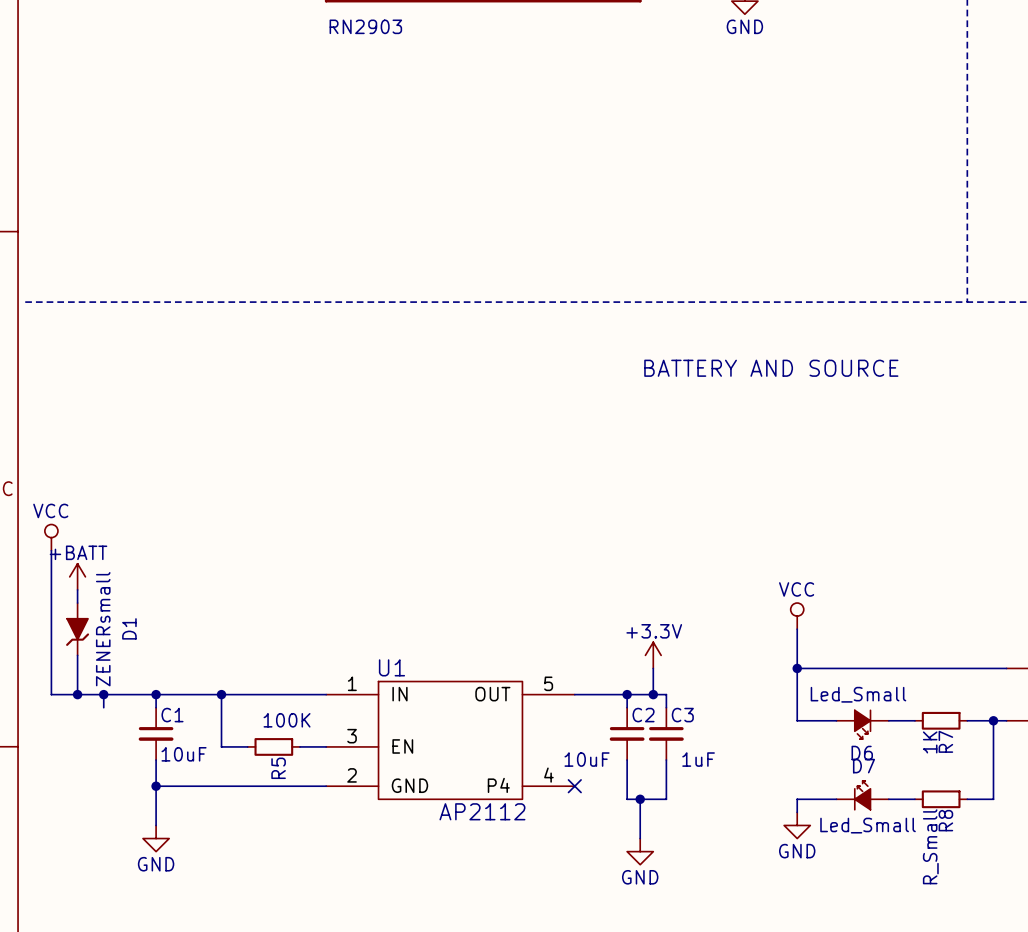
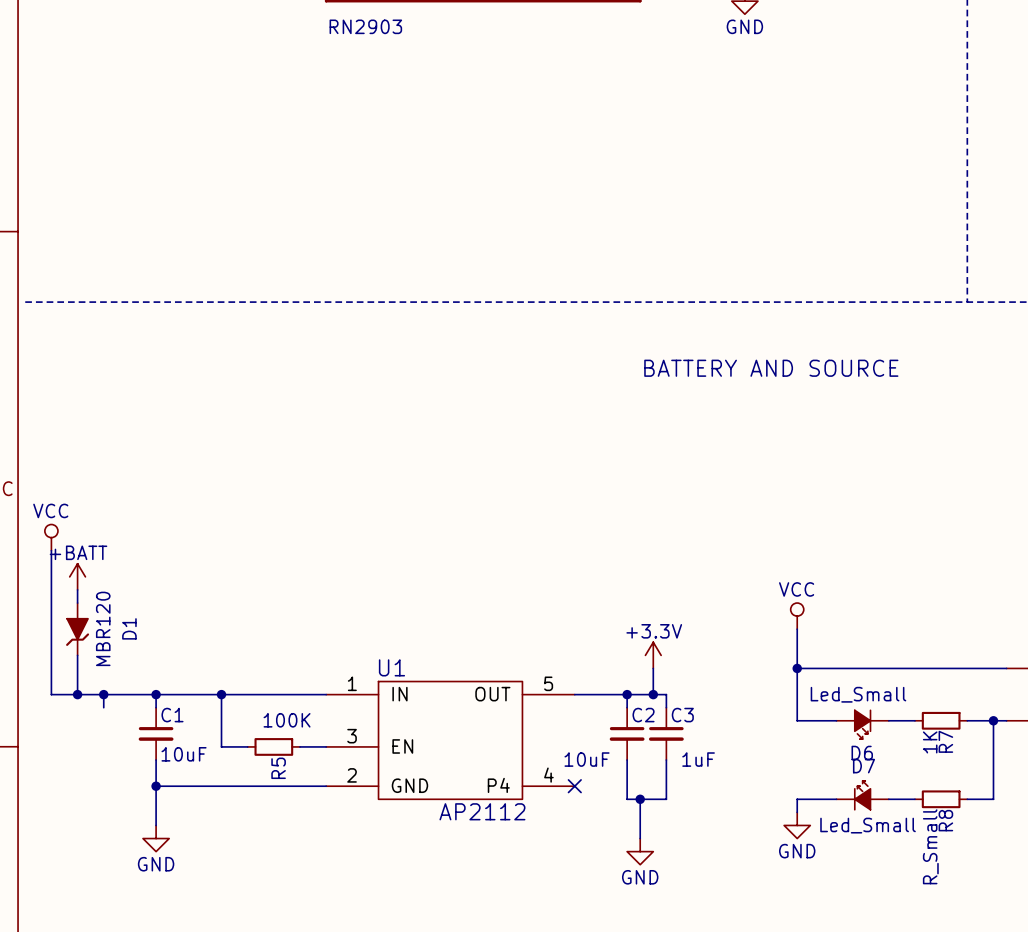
D1 value: ZENERsmall (103, 629) -> MBR120 (103, 628)

